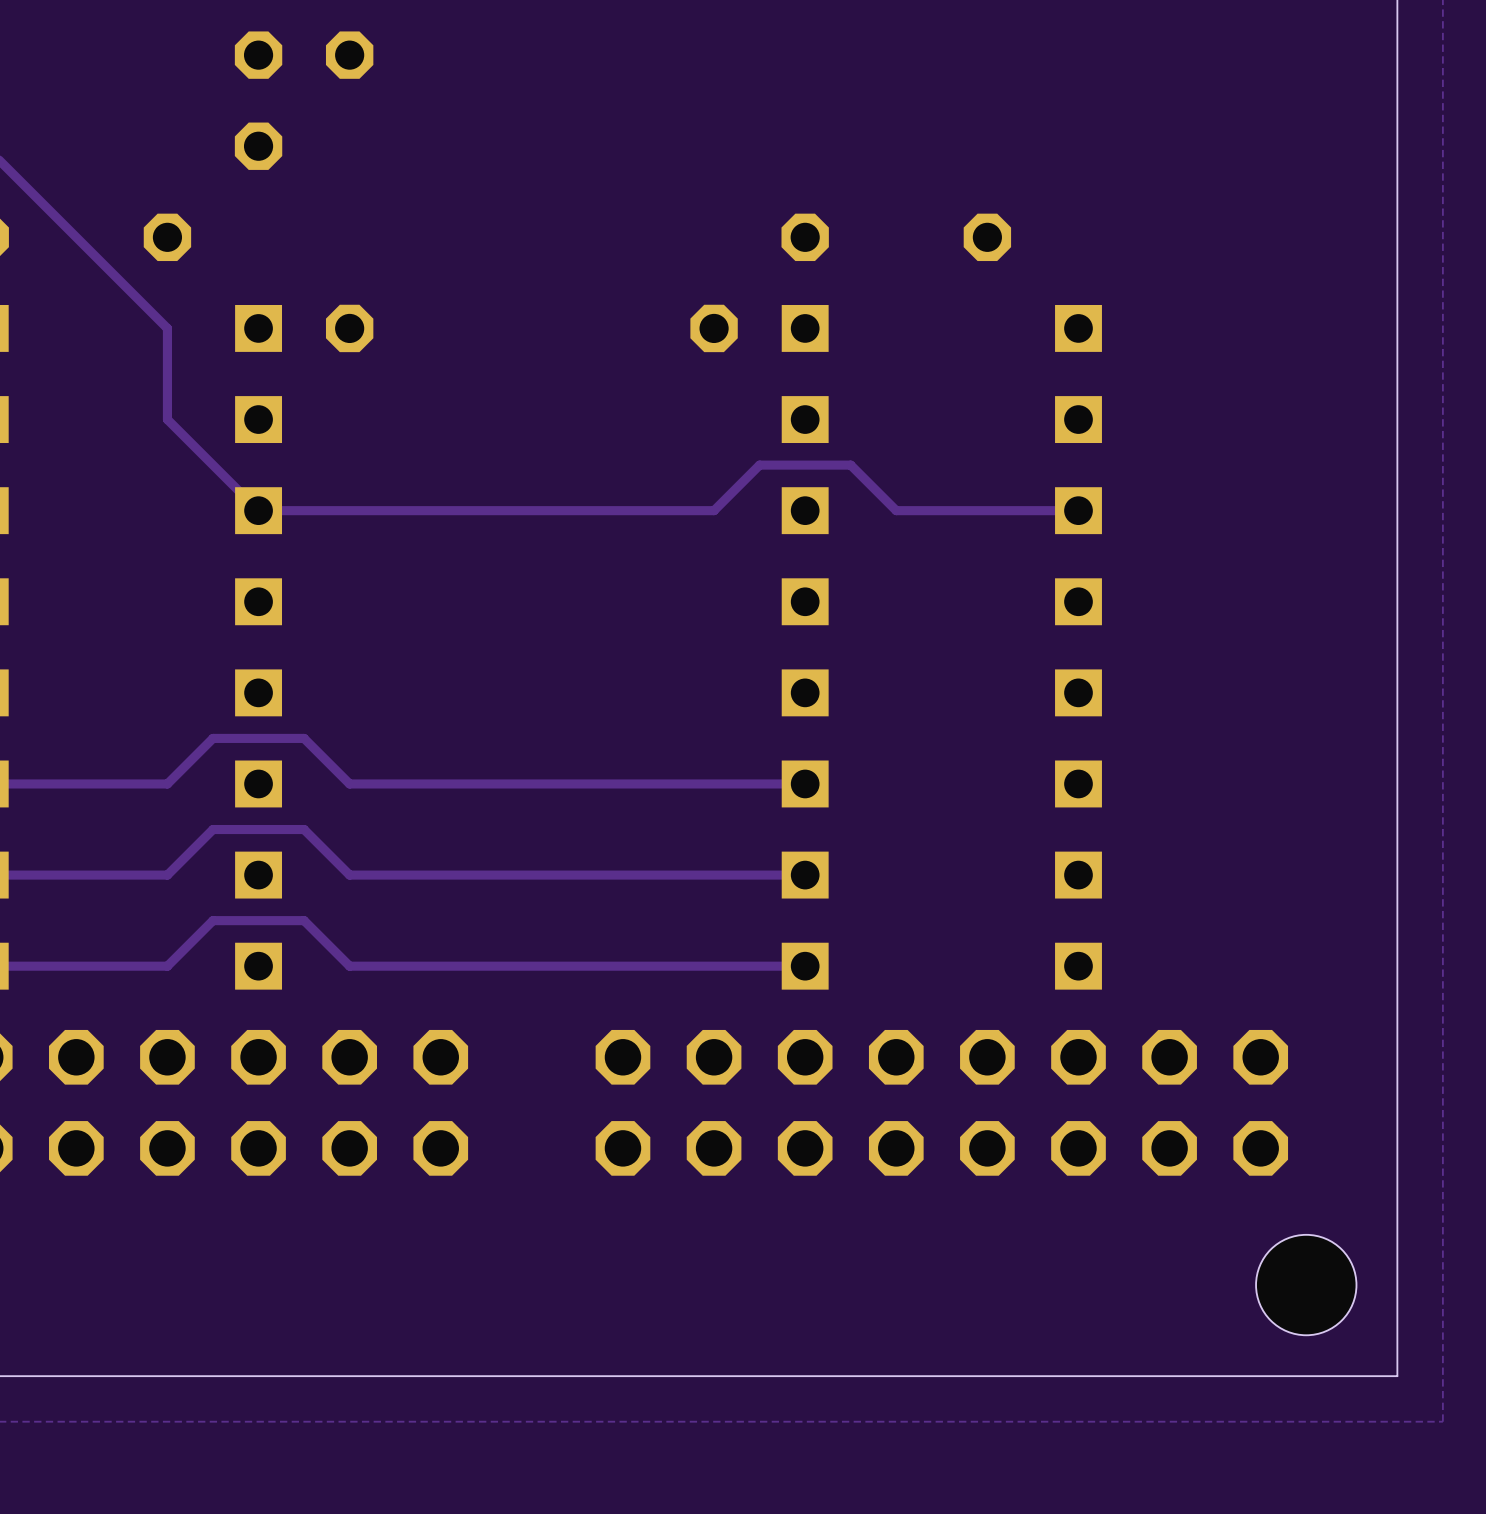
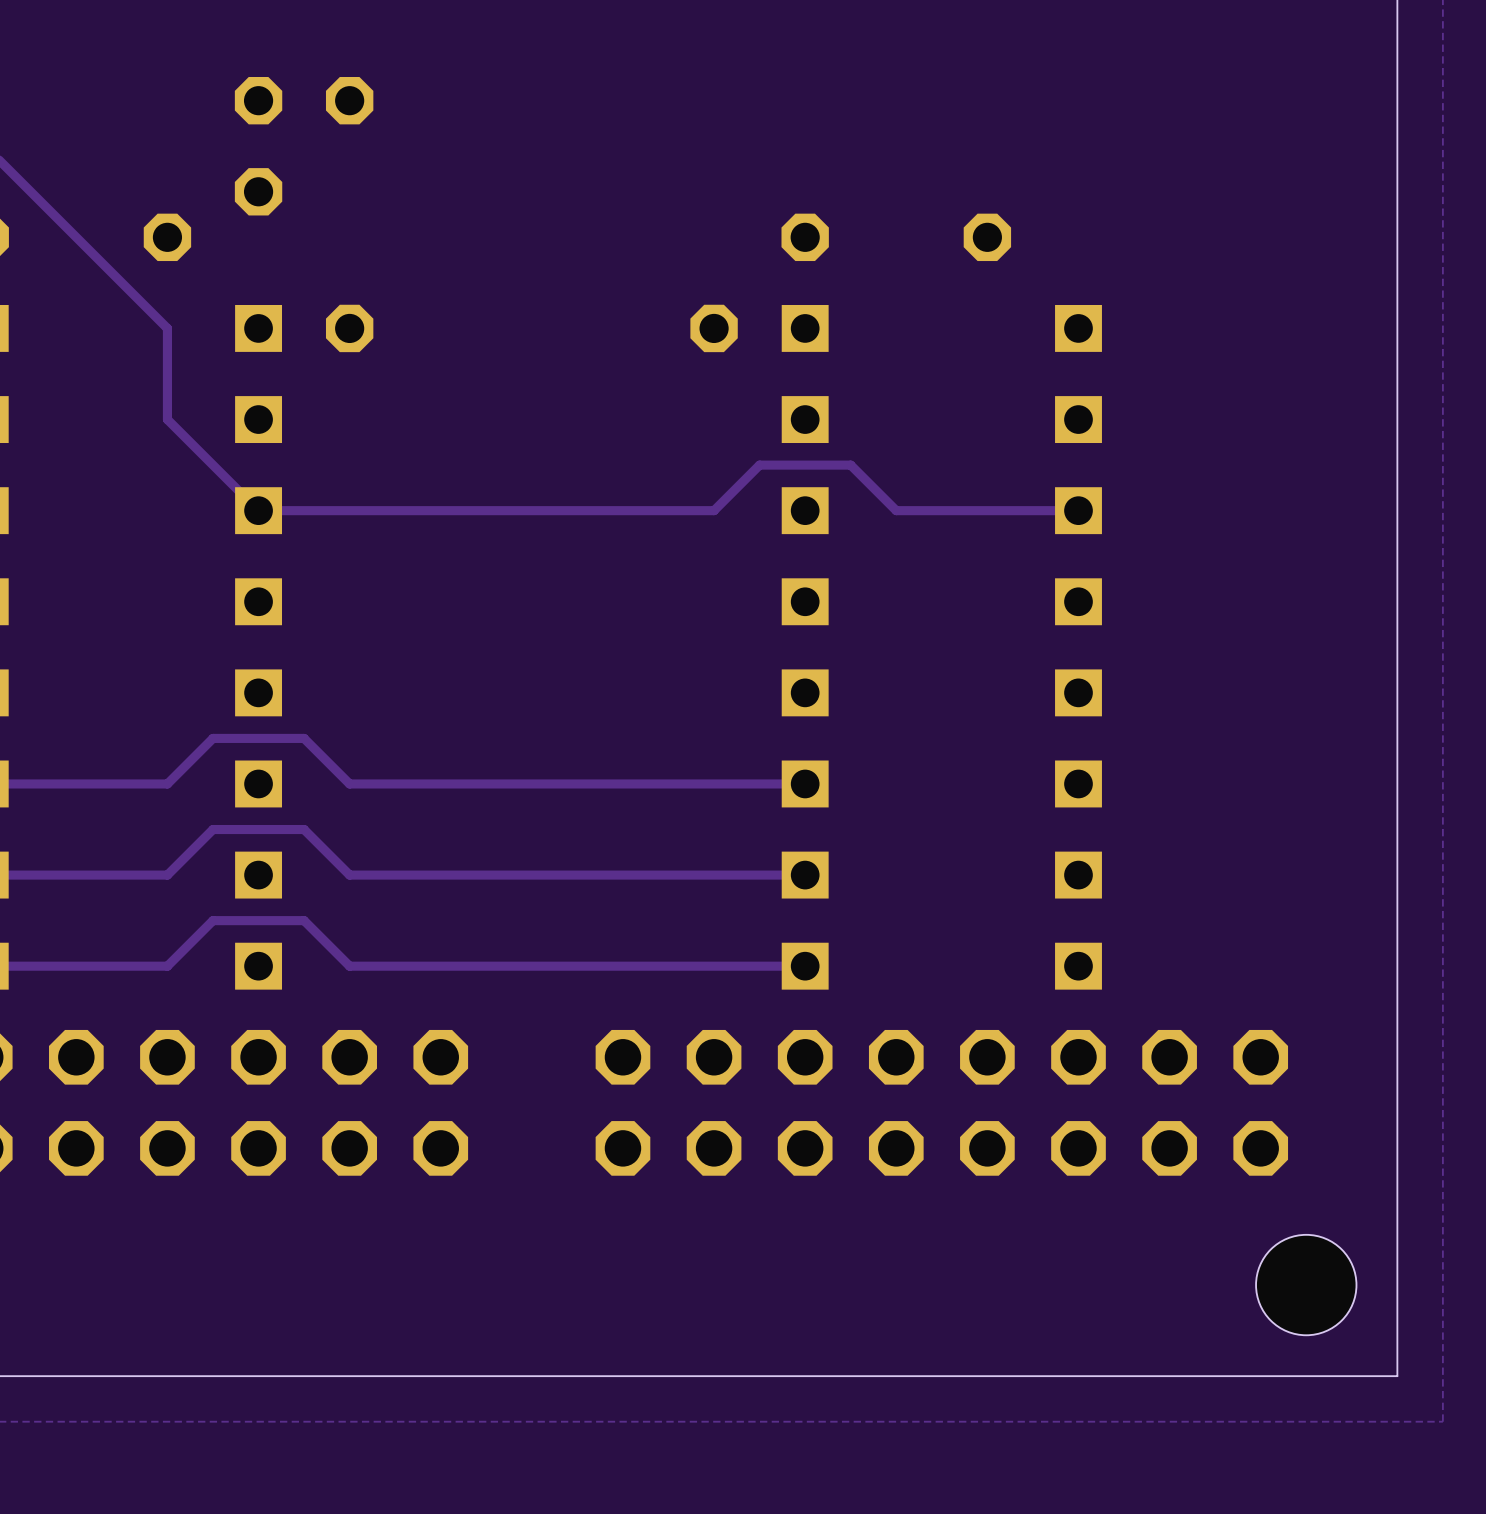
part position: (304, 100) -> (304, 146)

